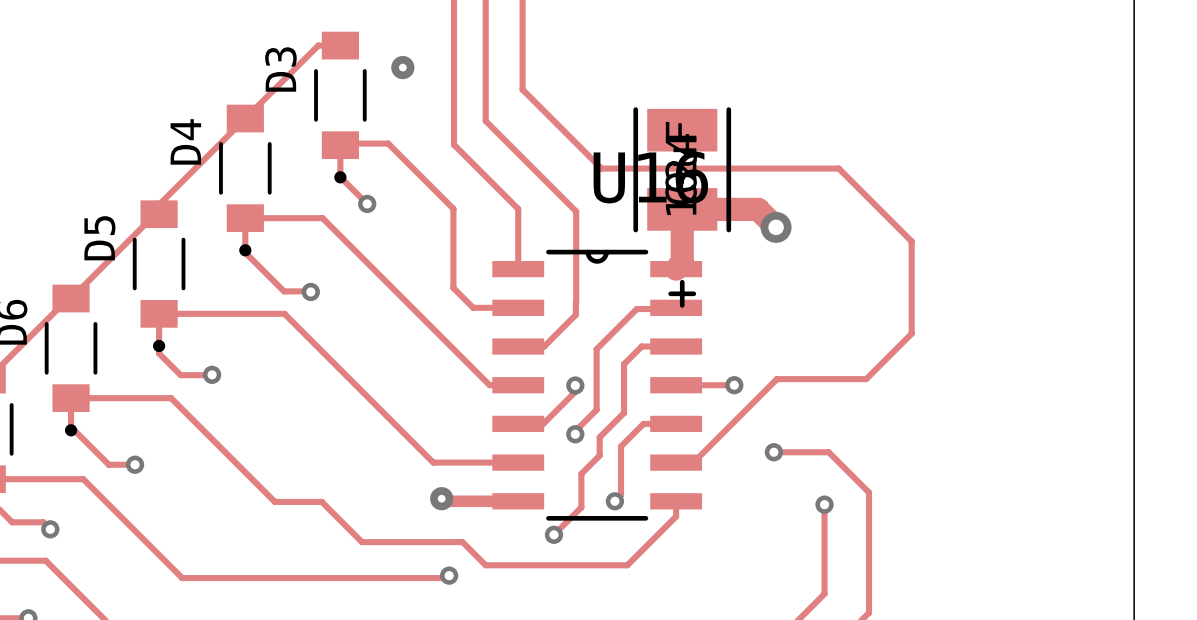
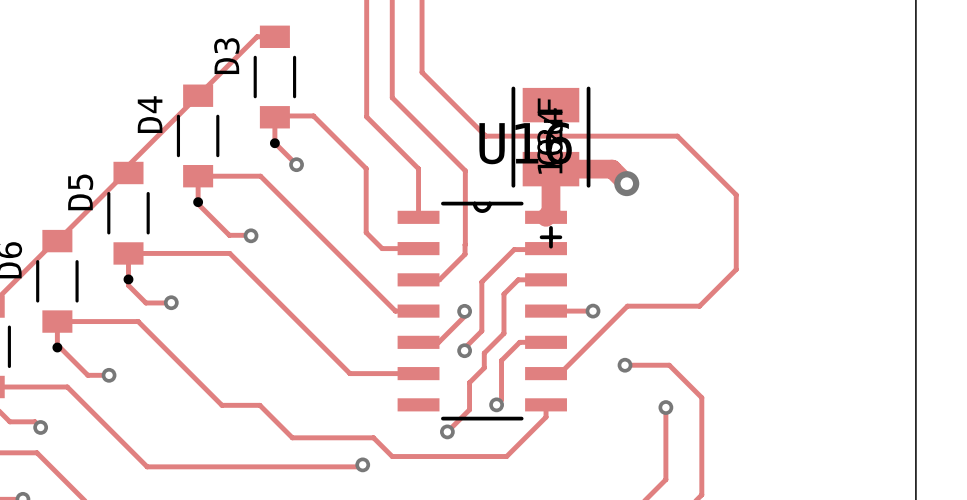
via: (402, 67) -> none
track: (441, 498) (444, 501) (518, 501) -> none
via: (441, 498) -> none

